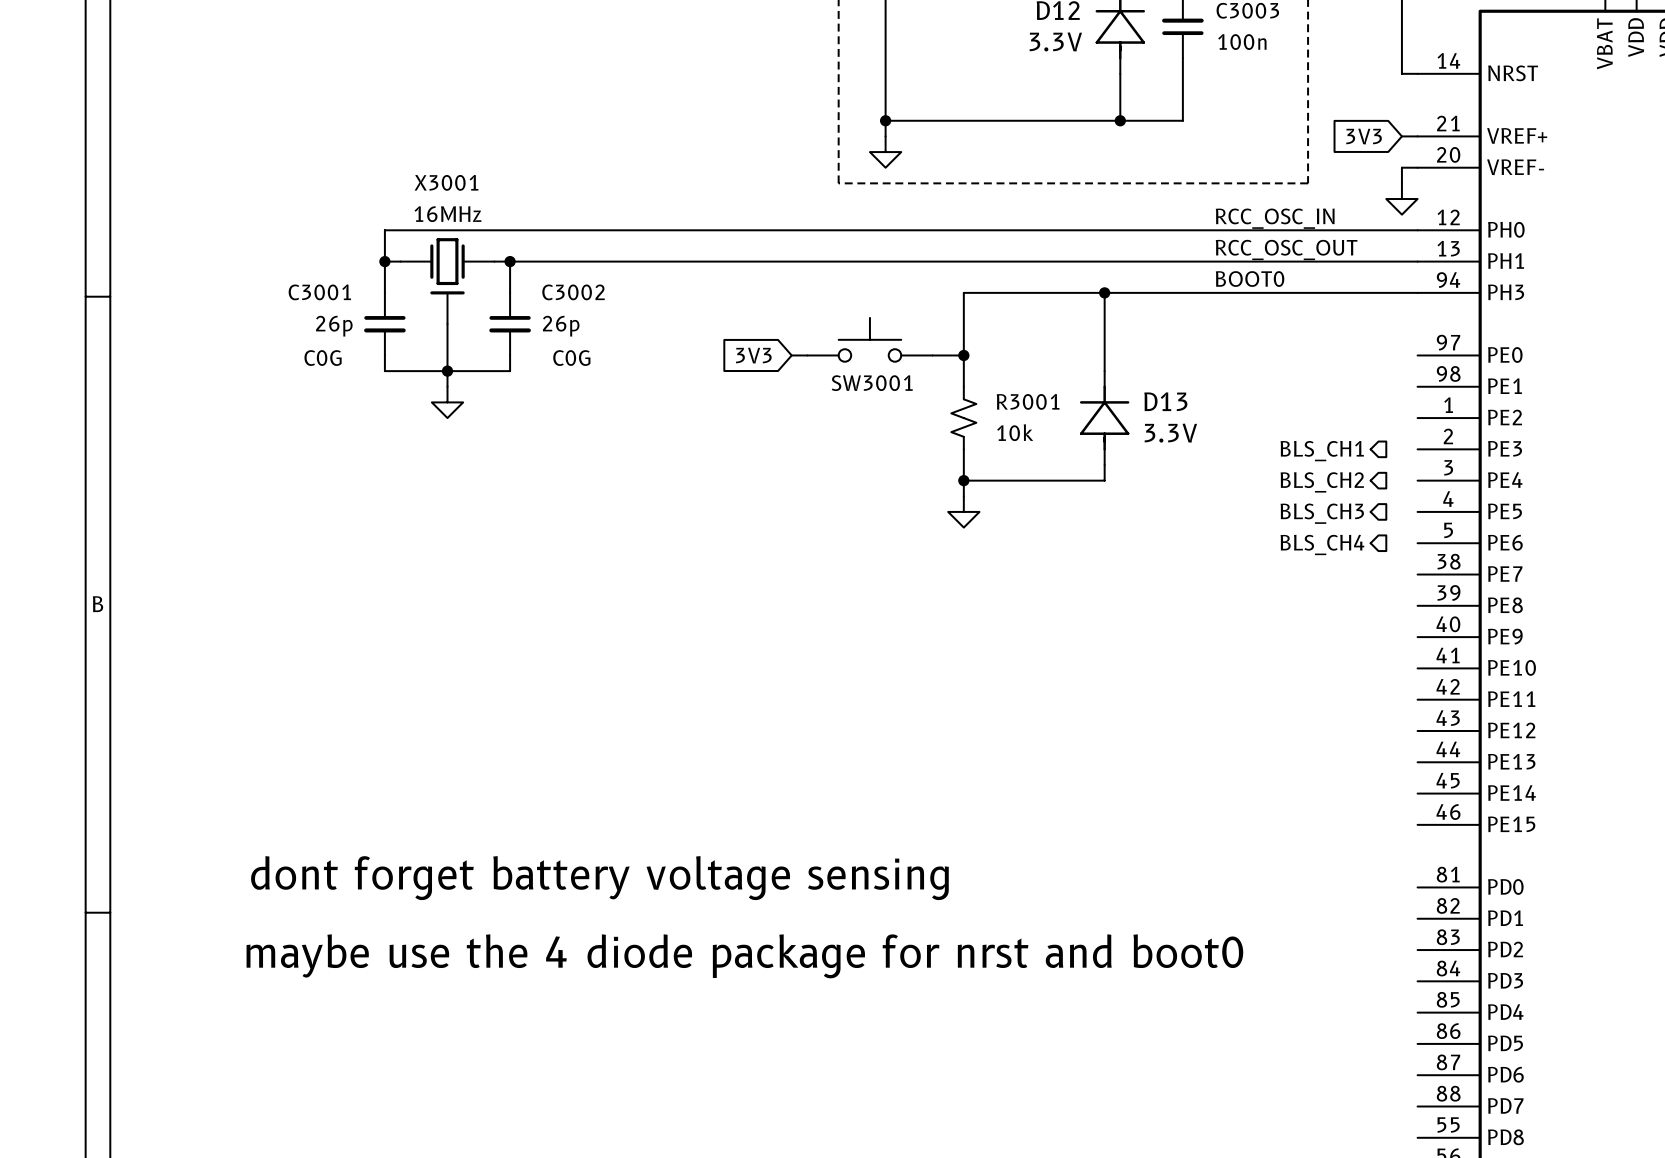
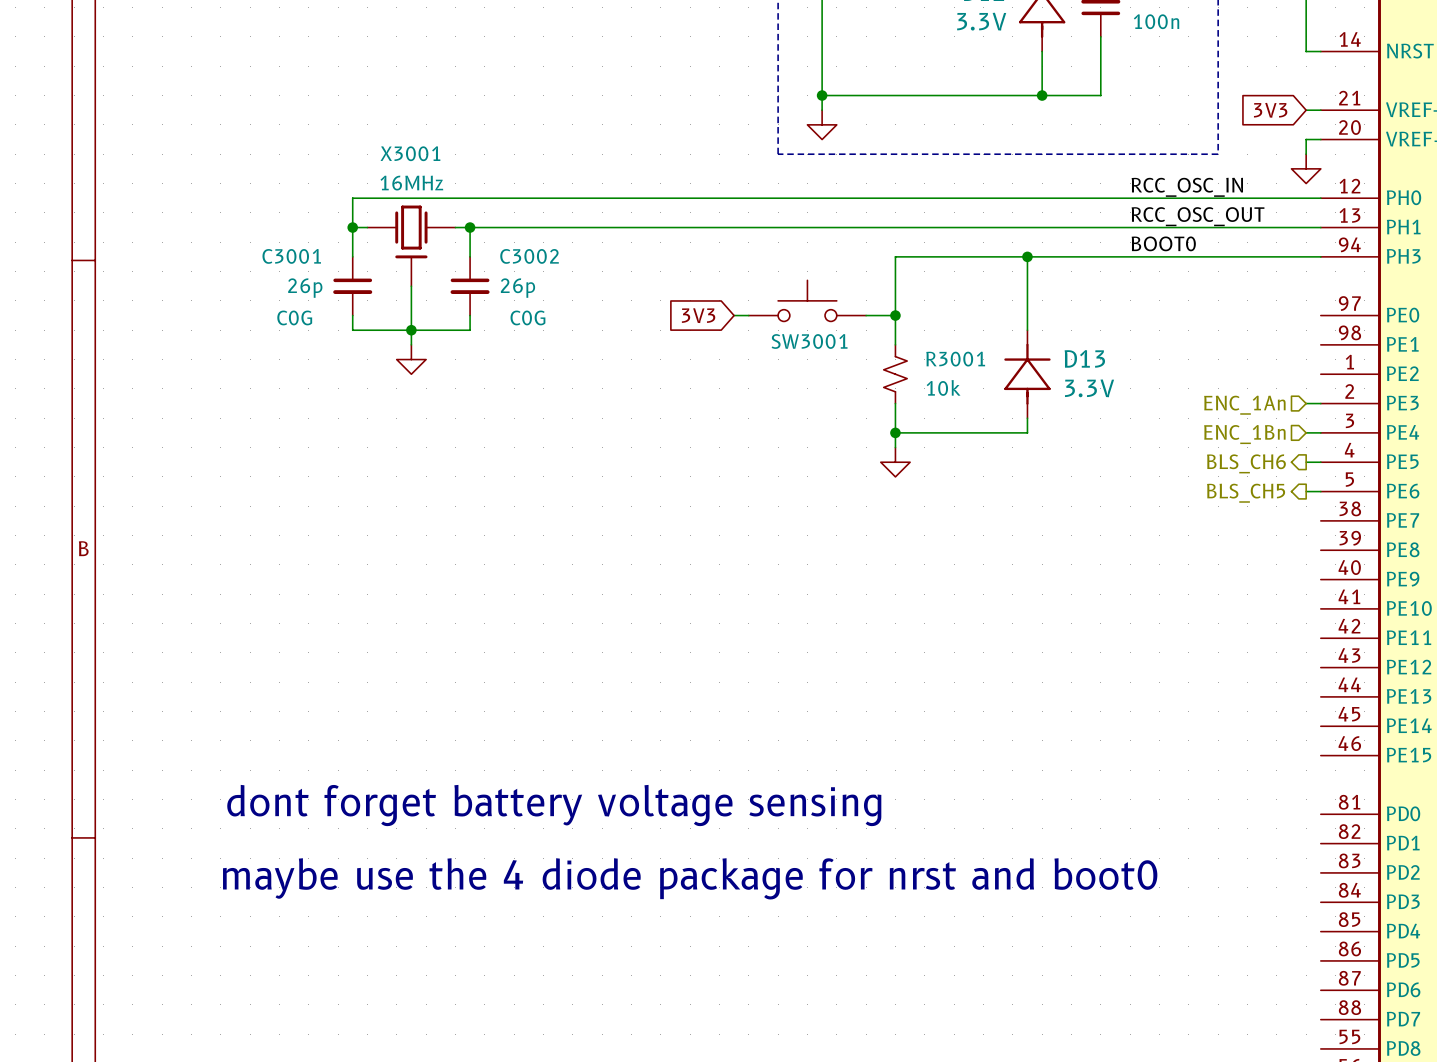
wire: none -> (1306, 403) (1320, 403)
hierarchical label: BLS_CH1 (1322, 451) -> none
hierarchical label: none -> ENC_1An (1244, 405)
wire: none -> (1306, 432) (1320, 432)
hierarchical label: BLS_CH2 (1322, 482) -> none
hierarchical label: none -> ENC_1Bn (1244, 434)
wire: none -> (1306, 462) (1320, 462)
hierarchical label: BLS_CH3 (1322, 513) -> BLS_CH6 (1246, 463)
wire: none -> (1306, 491) (1320, 491)
hierarchical label: BLS_CH4 (1322, 544) -> BLS_CH5 (1246, 493)

